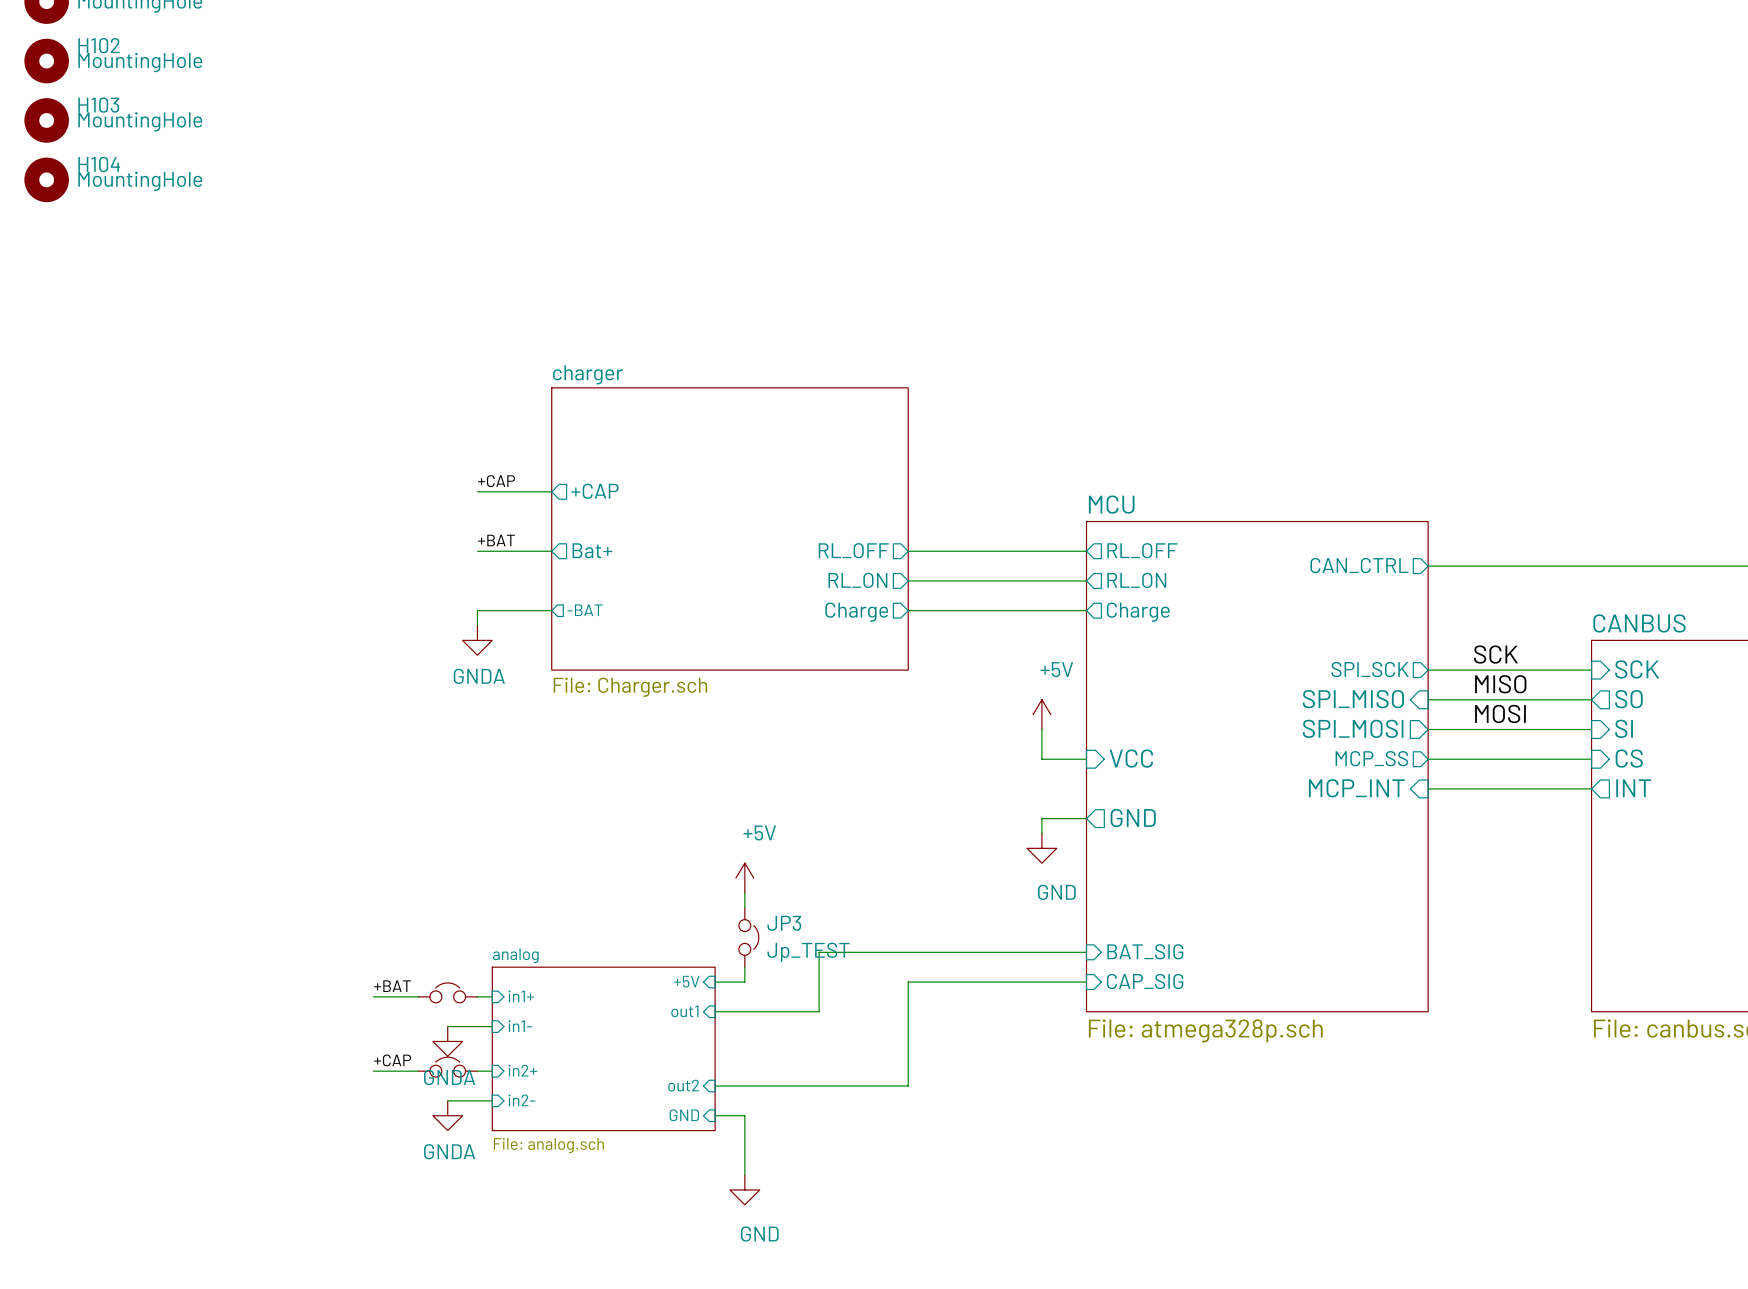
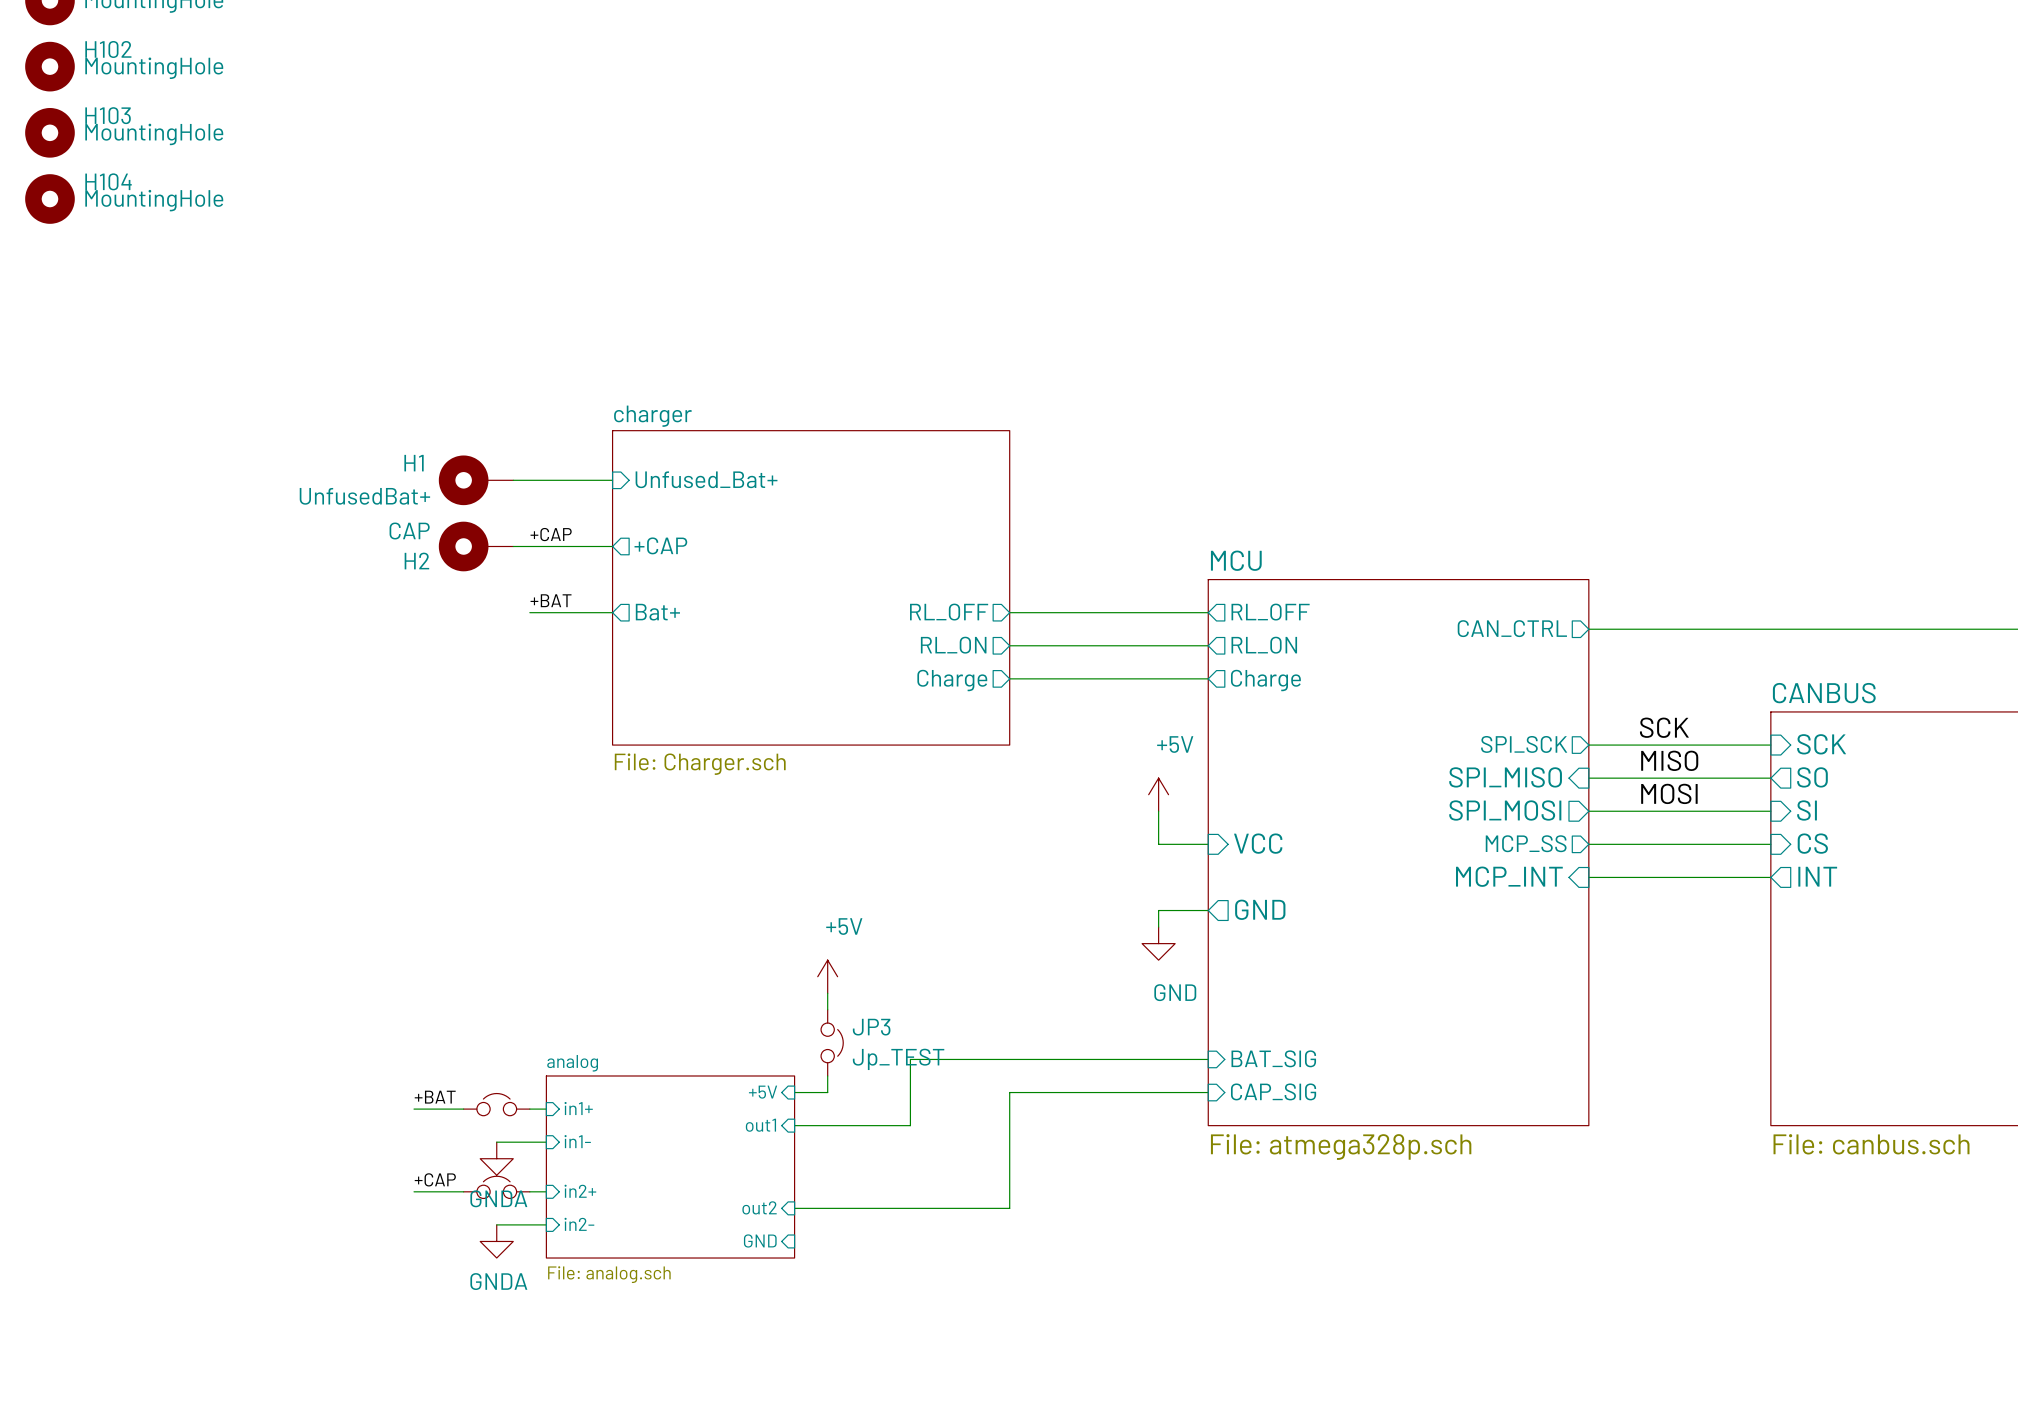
sheet pin: none -> Unfused_Bat+ (706, 479)
H1: none -> UnfusedBat+ (476, 480)
wire: none -> (513, 480) (612, 480)
H2: none -> CAP (476, 546)
wire: none -> (513, 546) (529, 546)
wire: (551, 610) (477, 610) (477, 625) -> none
sheet pin: -BAT (584, 610) -> none
power symbol: GNDA (477, 640) -> none
wire: (715, 1115) (744, 1115) (744, 1175) -> none
power symbol: GND (744, 1190) -> none

